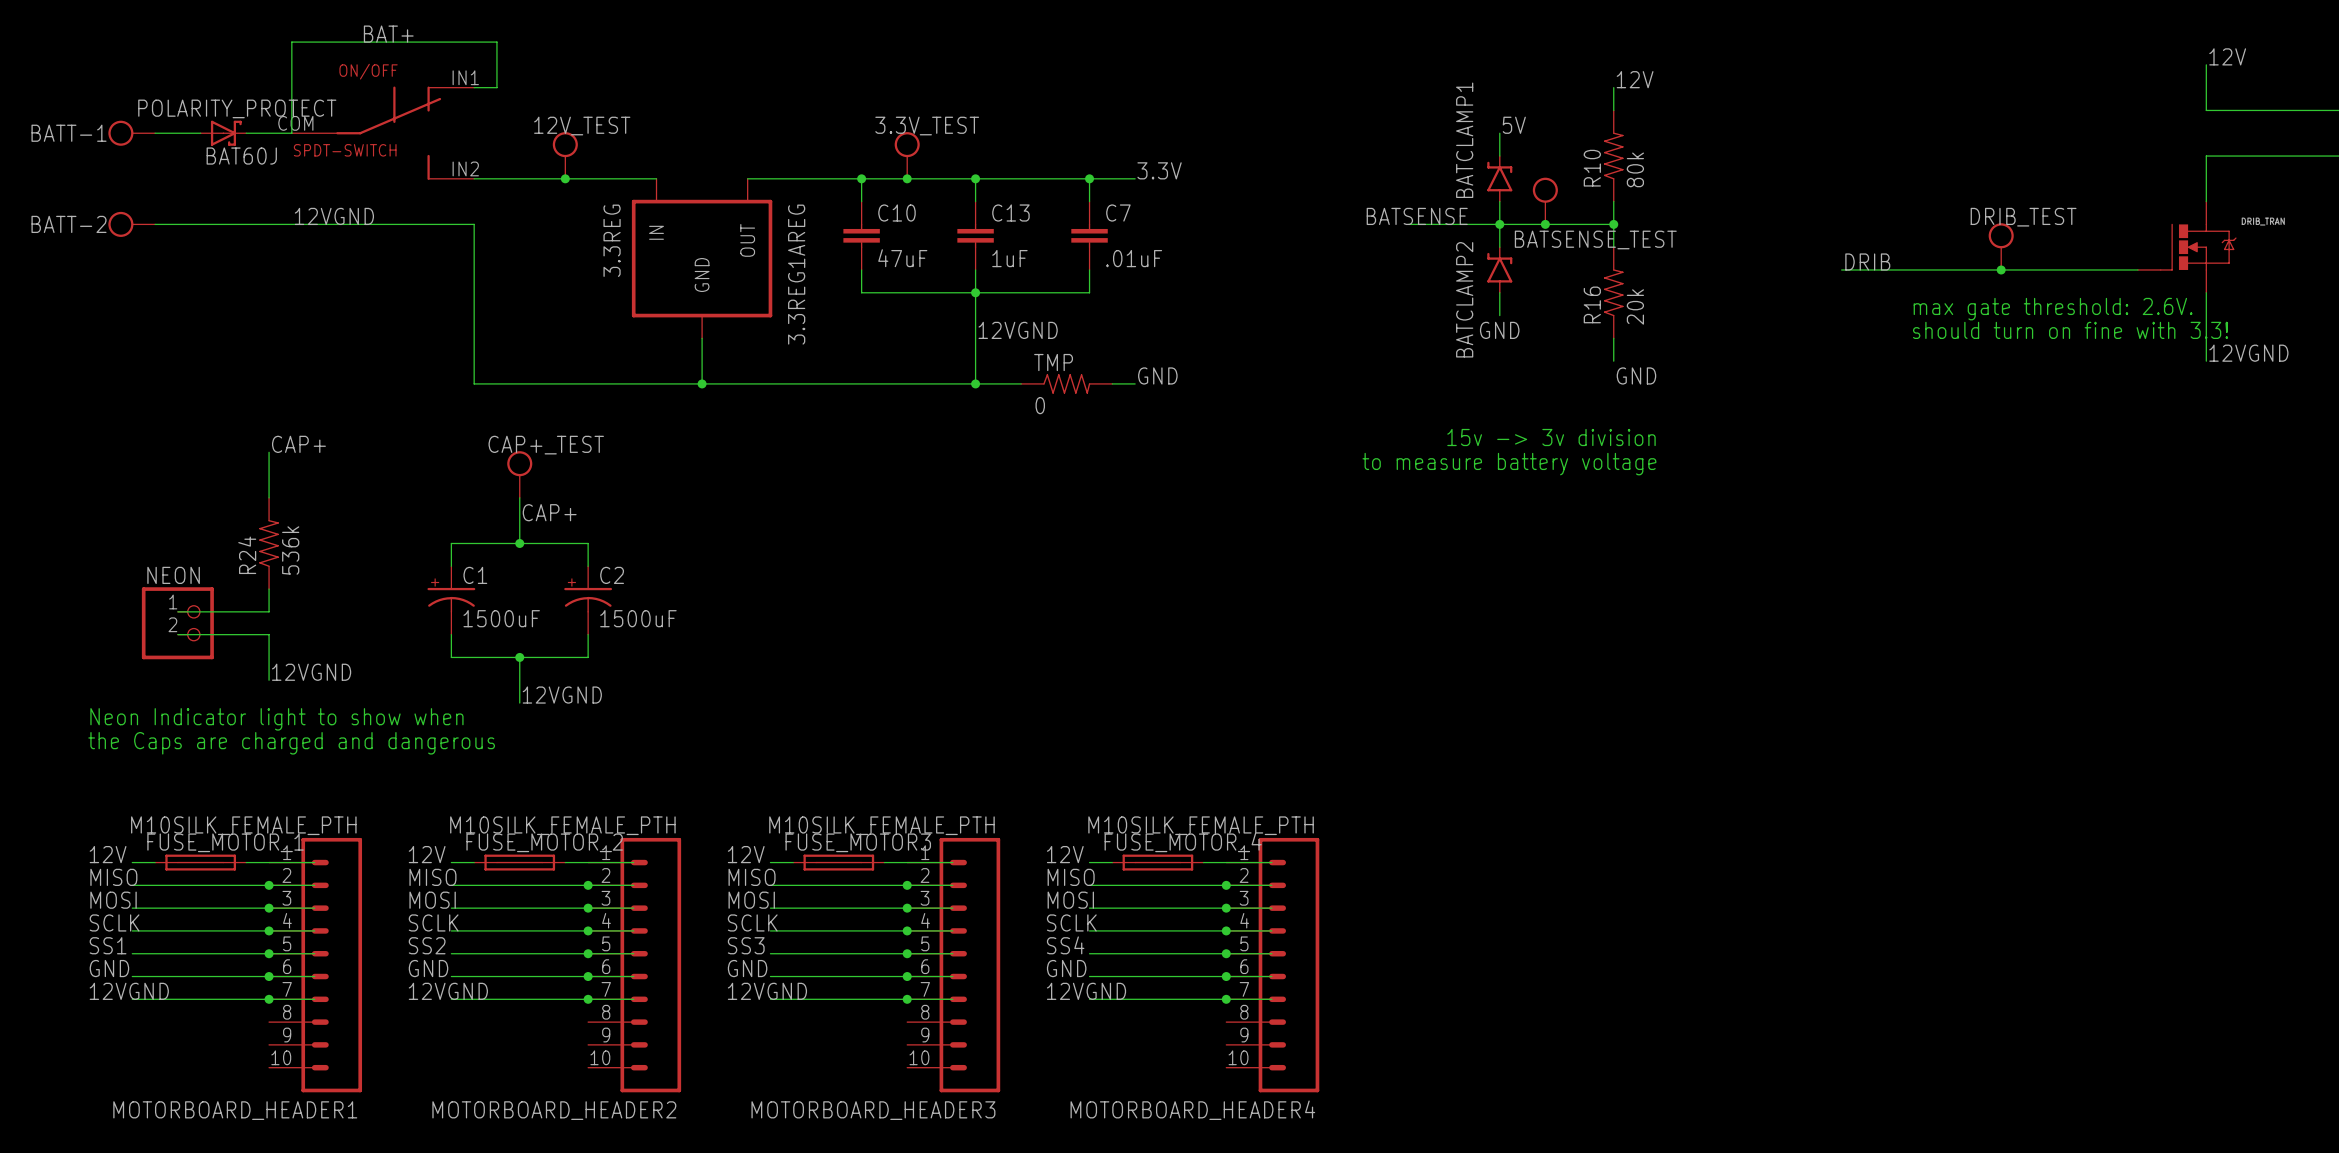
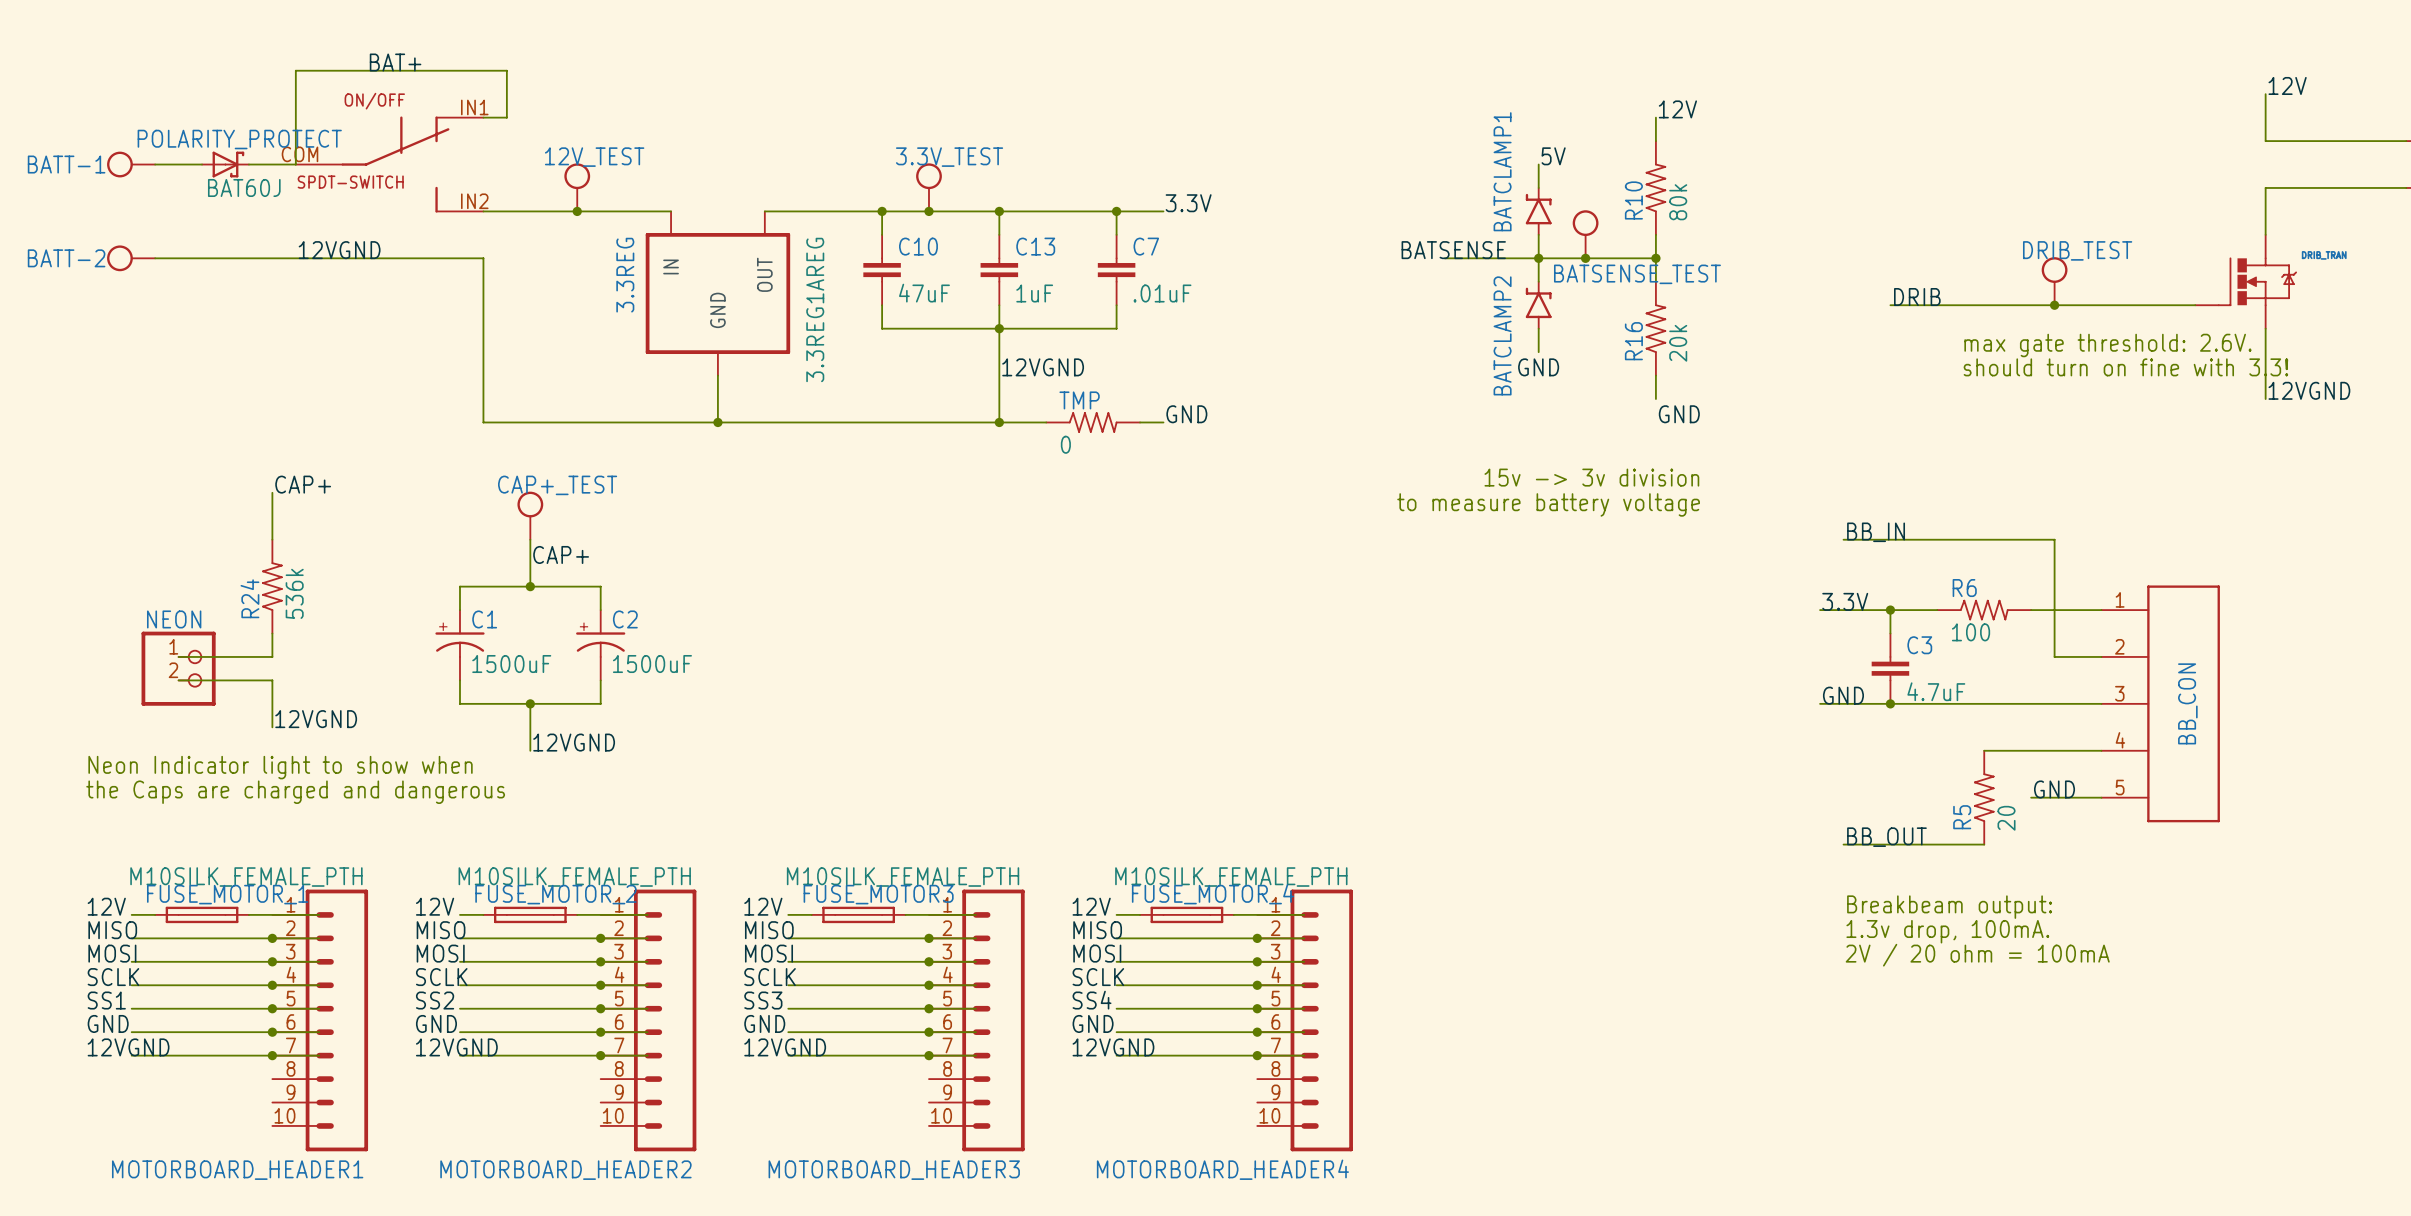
label: none -> BB_IN (1876, 532)
wire: none -> (1843, 539) (2054, 539) (2054, 656) (2101, 656)
label: none -> 3.3V (1845, 601)
wire: none -> (1820, 610) (1937, 610)
wire: none -> (1890, 610) (1890, 633)
junction: none -> (1890, 610)
R6: none -> 100 (1984, 610)
wire: none -> (2031, 610) (2101, 610)
C3: none -> 4.7uF (1890, 668)
label: none -> GND (1843, 695)
wire: none -> (1820, 703) (2101, 703)
junction: none -> (1890, 703)
BB_CON: none -> (2160, 703)
wire: none -> (1984, 750) (2101, 750)
label: none -> GND (2054, 789)
R5: none -> 20 (1984, 797)
wire: none -> (2031, 797) (2101, 797)
label: none -> BB_OUT (1886, 837)
wire: none -> (1843, 844) (1984, 844)
text: none -> Breakbeam output: (1949, 907)
text: none -> 1.3v drop, 100mA. (1947, 931)
text: none -> 2V / 20 ohm = 100mA (1977, 955)

